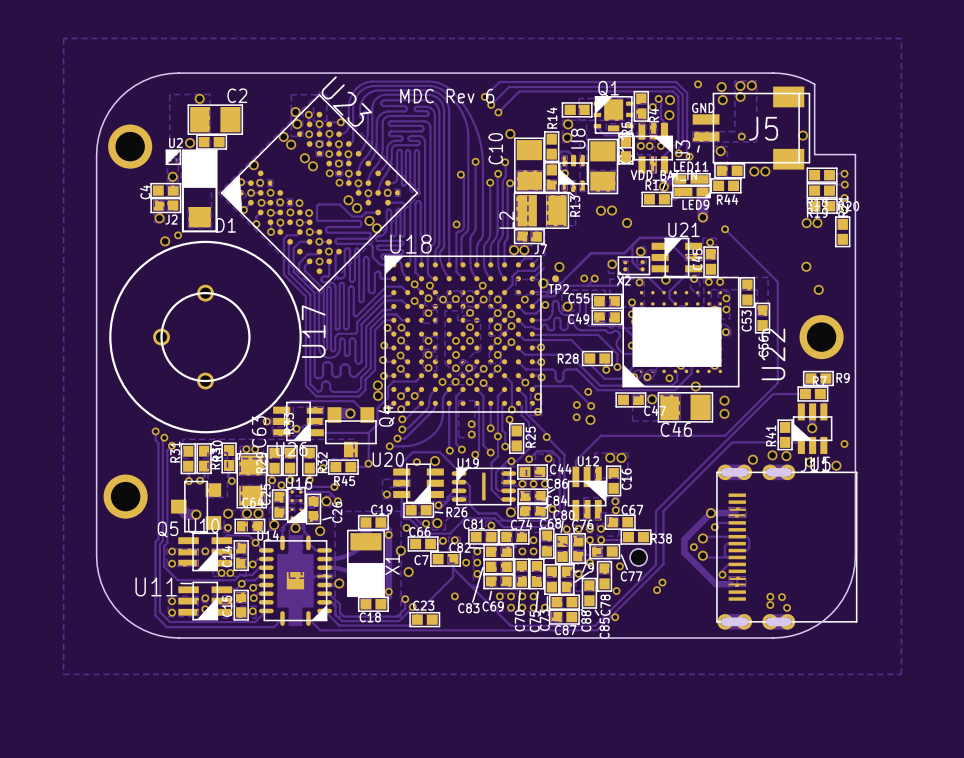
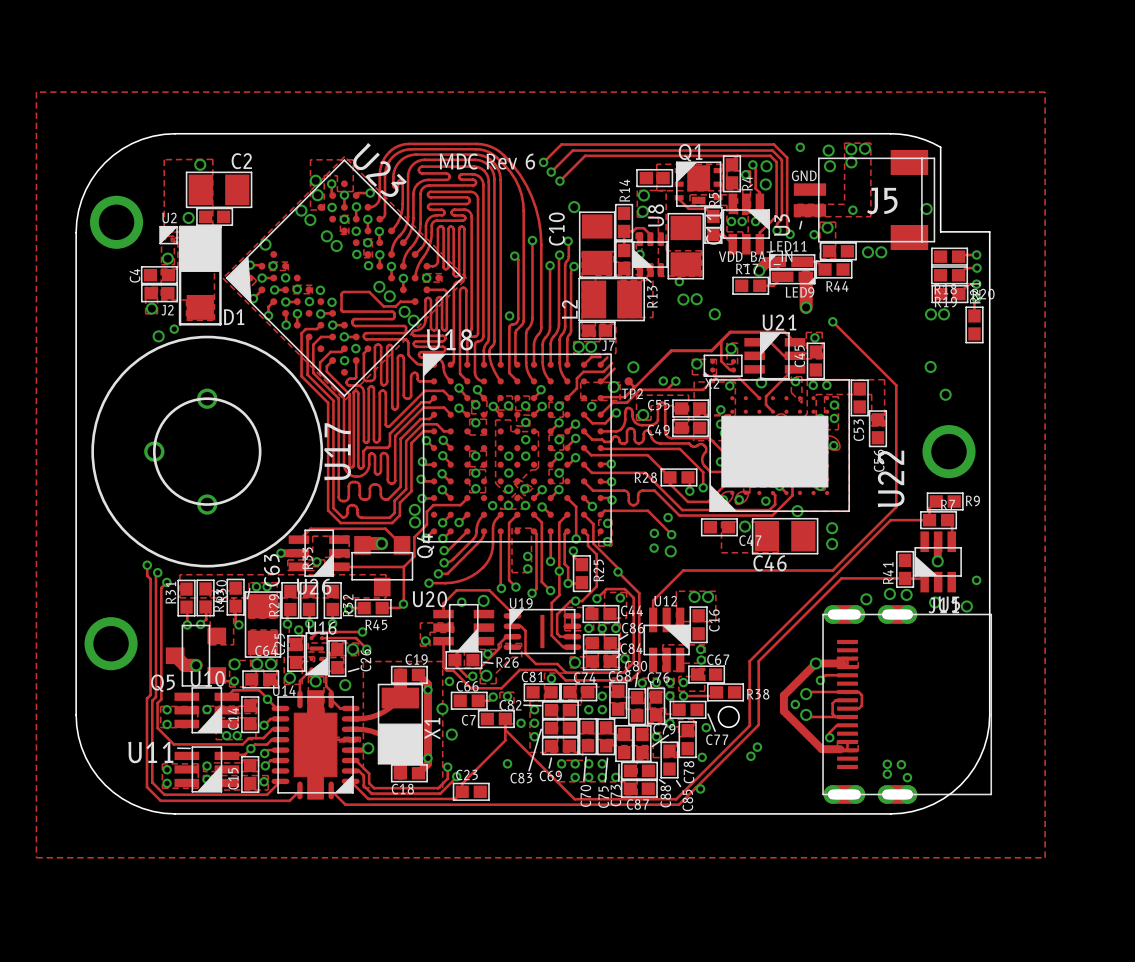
via: none -> (814, 234)
via: none -> (679, 281)

